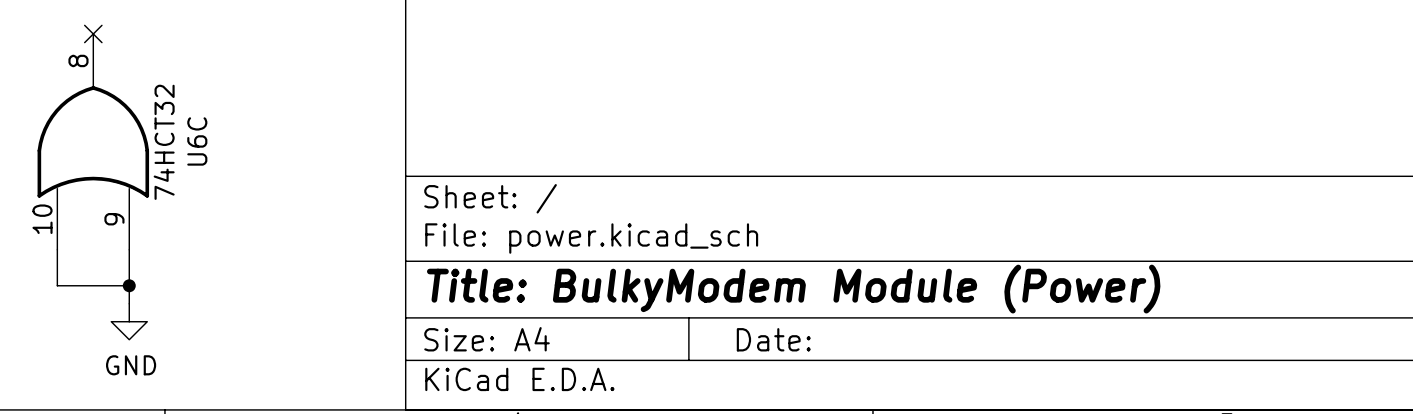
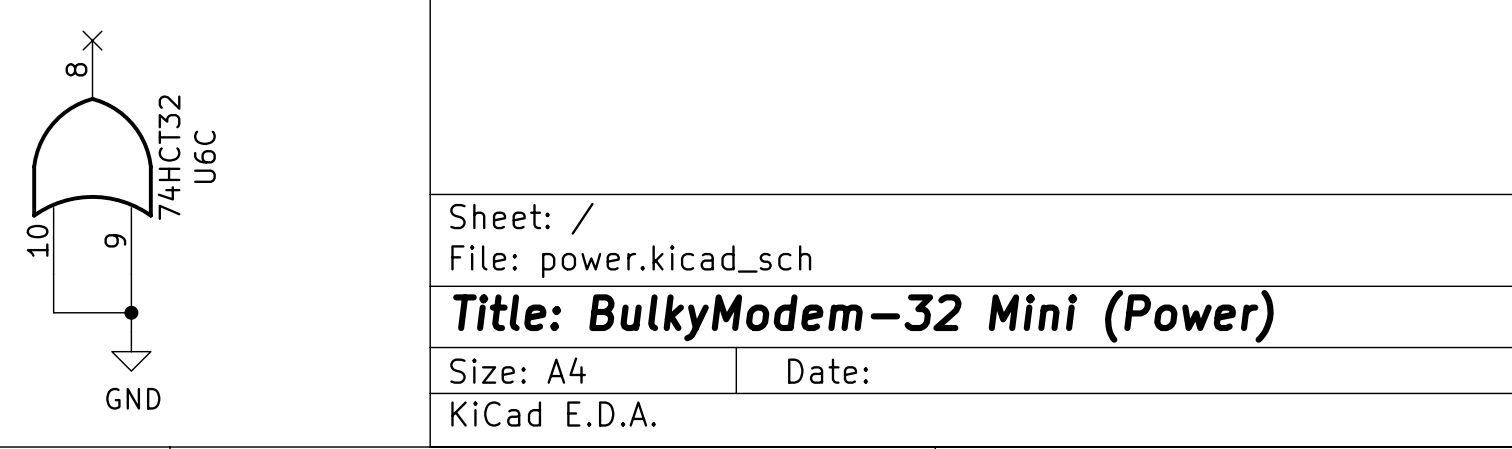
title block: Title: BulkyModem Module (Power) (793, 289) -> Title: BulkyModem-32 Mini (Power) (863, 316)

